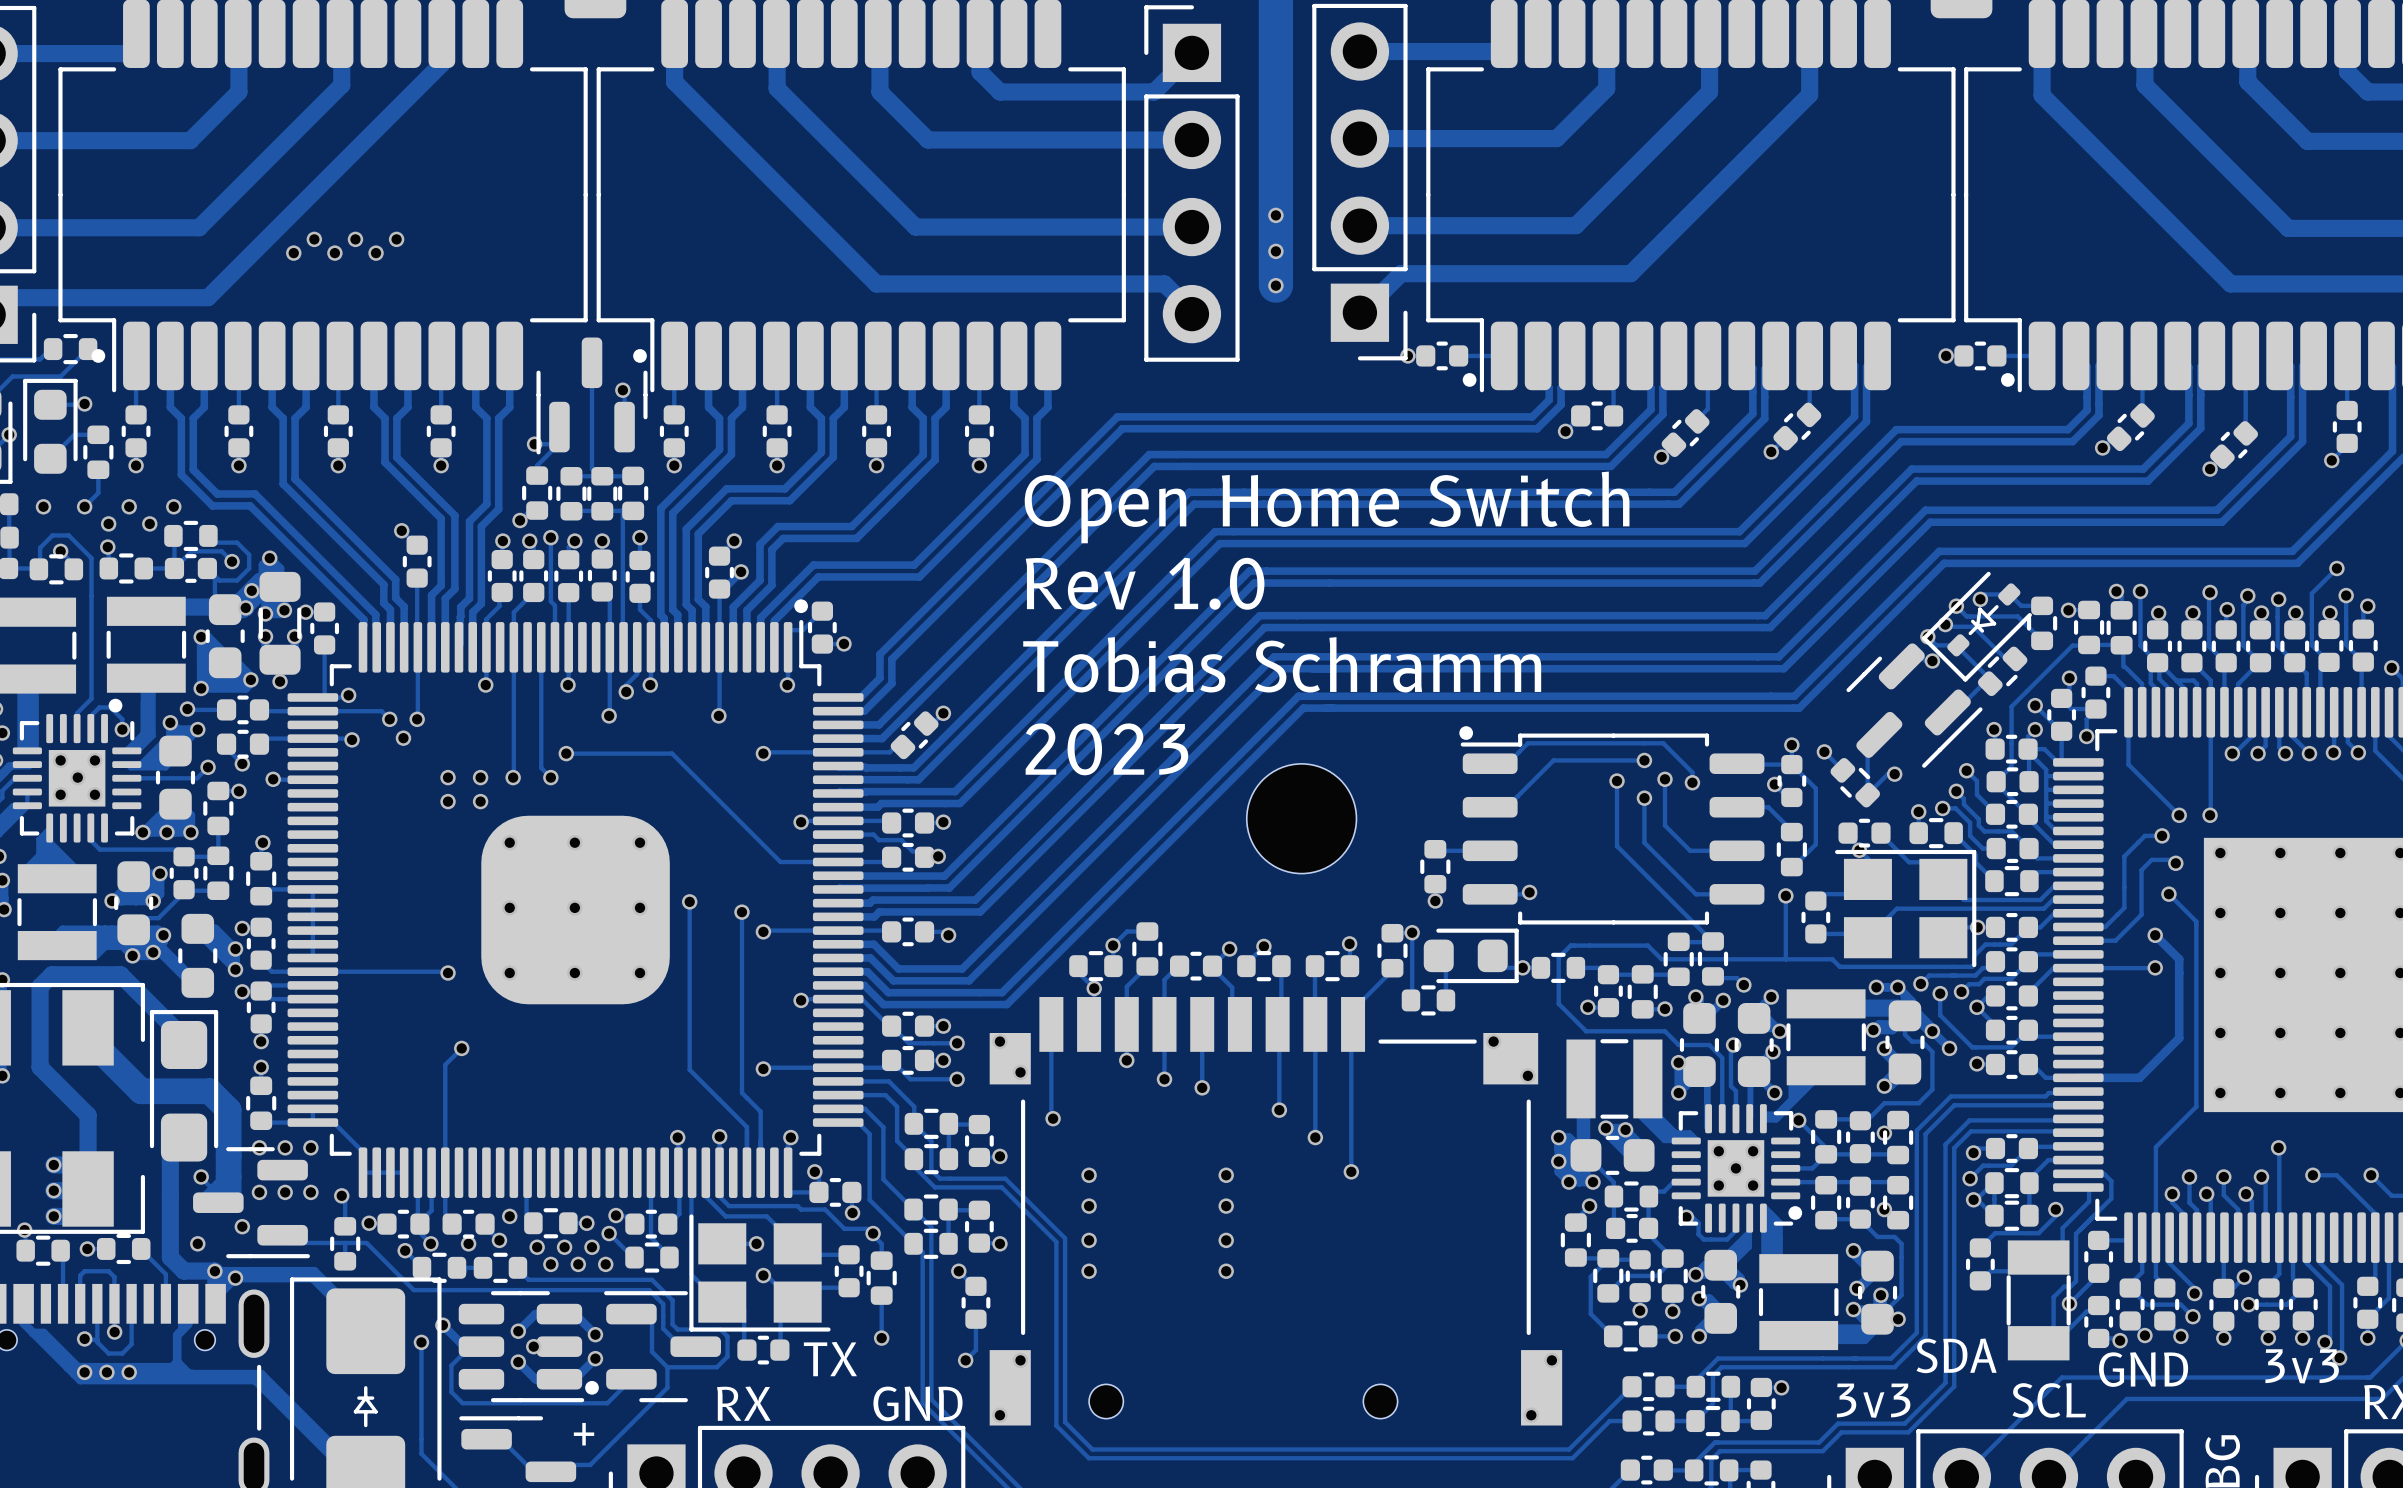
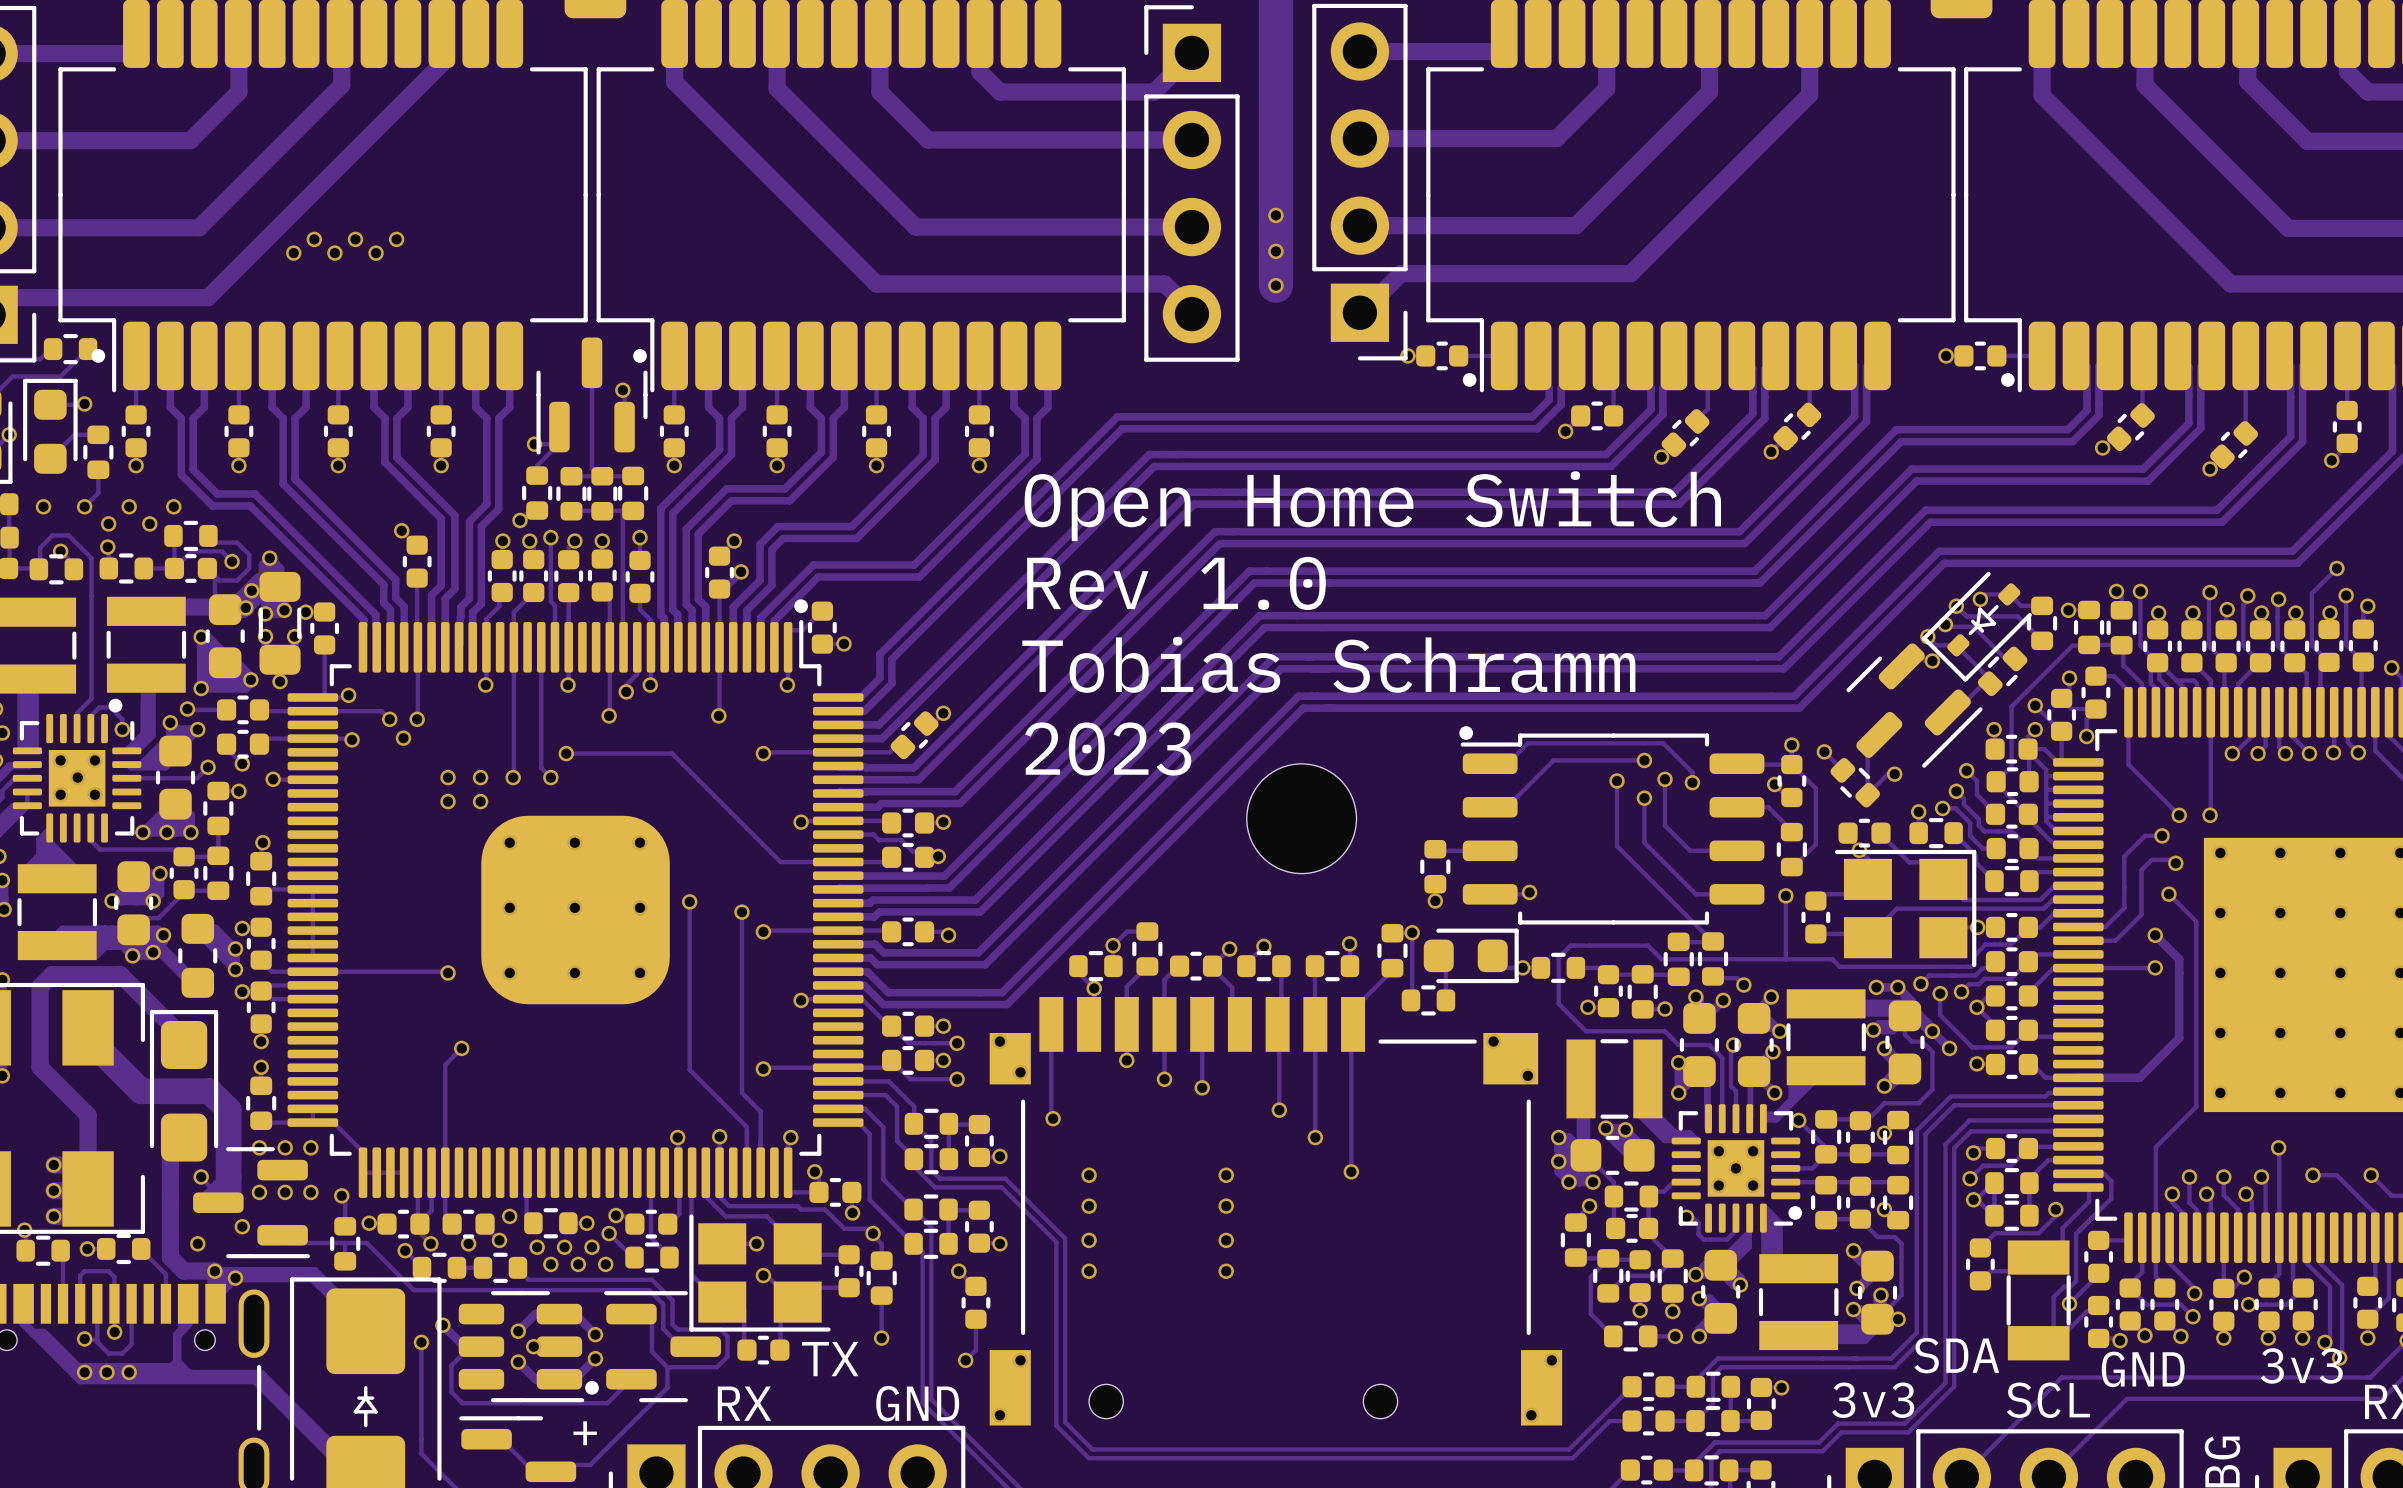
track: (873, 944) (898, 968) (962, 968) (978, 952) -> (873, 944) (883, 952) (978, 952)
track: (877, 964) (893, 980) (969, 980) (985, 964) -> (877, 964) (985, 964)

